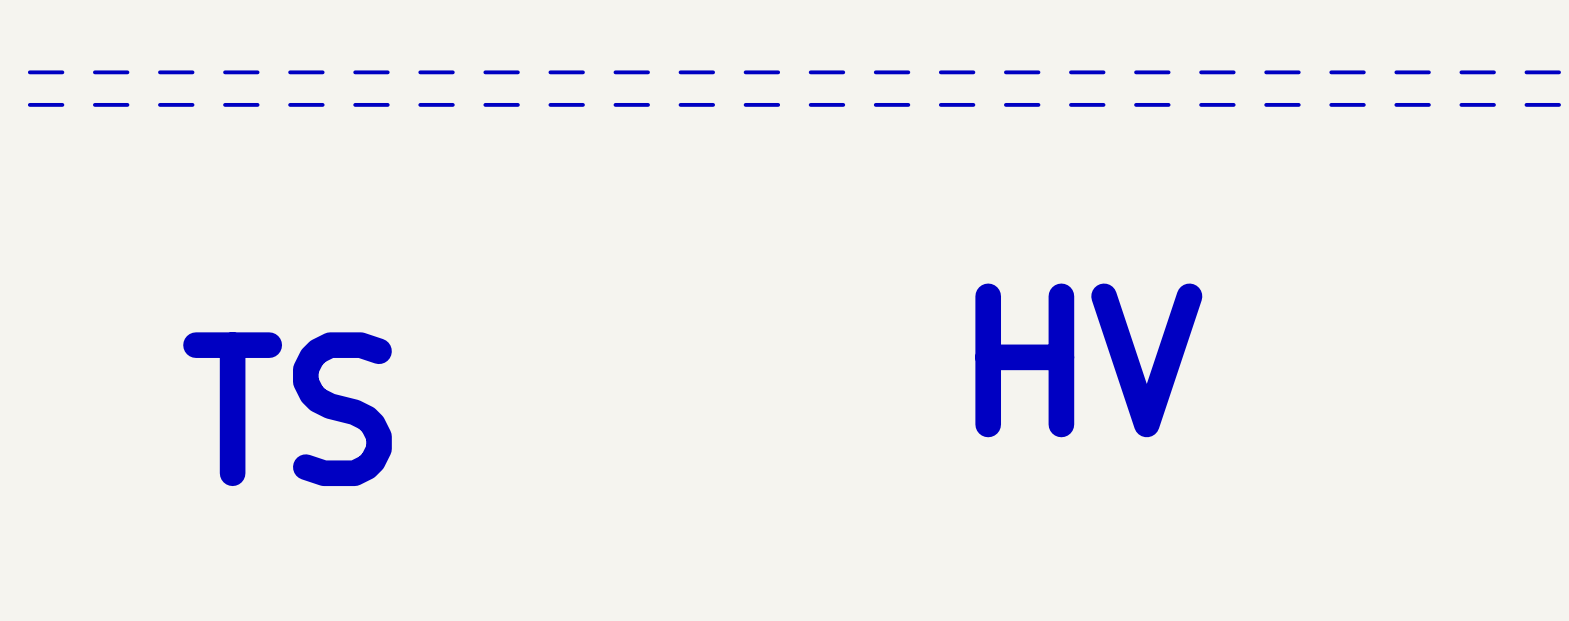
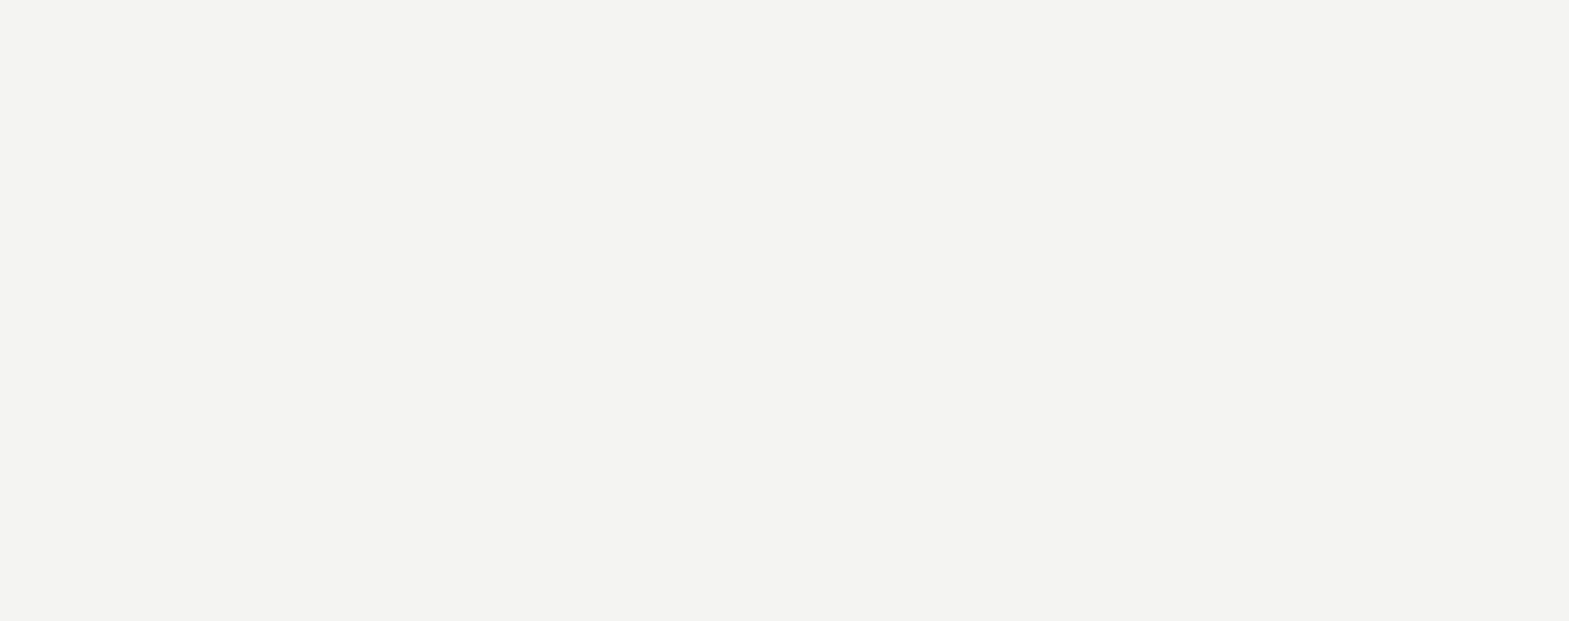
line: (29, 72) (62, 72) -> none
line: (94, 72) (127, 72) -> none
line: (159, 72) (192, 72) -> none
line: (225, 72) (257, 72) -> none
line: (290, 72) (322, 72) -> none
line: (355, 72) (387, 72) -> none
line: (420, 72) (452, 72) -> none
line: (485, 72) (517, 72) -> none
line: (550, 72) (582, 72) -> none
line: (615, 72) (648, 72) -> none
line: (680, 72) (713, 72) -> none
line: (745, 72) (778, 72) -> none
line: (810, 72) (843, 72) -> none
line: (875, 72) (908, 72) -> none
line: (940, 72) (973, 72) -> none
line: (1005, 72) (1038, 72) -> none
line: (1070, 72) (1103, 72) -> none
line: (1136, 72) (1168, 72) -> none
line: (1201, 72) (1233, 72) -> none
line: (1266, 72) (1298, 72) -> none
line: (1331, 72) (1363, 72) -> none
line: (1396, 72) (1428, 72) -> none
line: (1461, 72) (1493, 72) -> none
line: (1526, 72) (1559, 72) -> none
line: (29, 104) (62, 104) -> none
line: (94, 104) (127, 104) -> none
line: (159, 104) (192, 104) -> none
line: (225, 104) (257, 104) -> none
line: (290, 104) (322, 104) -> none
line: (355, 104) (387, 104) -> none
line: (420, 104) (452, 104) -> none
line: (485, 104) (517, 104) -> none
line: (550, 104) (582, 104) -> none
line: (615, 104) (648, 104) -> none
line: (680, 104) (713, 104) -> none
line: (745, 104) (778, 104) -> none
line: (810, 104) (843, 104) -> none
line: (875, 104) (908, 104) -> none
line: (940, 104) (973, 104) -> none
line: (1005, 104) (1038, 104) -> none
line: (1070, 104) (1103, 104) -> none
line: (1136, 104) (1168, 104) -> none
line: (1201, 104) (1233, 104) -> none
line: (1266, 104) (1298, 104) -> none
line: (1331, 104) (1363, 104) -> none
line: (1396, 104) (1428, 104) -> none
line: (1461, 104) (1493, 104) -> none
line: (1526, 104) (1559, 104) -> none
text: HV (1088, 360) -> none
text: TS (287, 409) -> none

